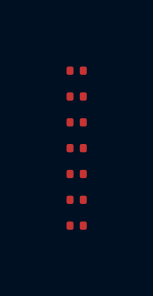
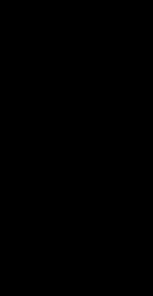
part: (76, 70) -> none
part: (76, 96) -> none
part: (76, 122) -> none
part: (76, 148) -> none
part: (76, 173) -> none
part: (76, 199) -> none
part: (76, 225) -> none

